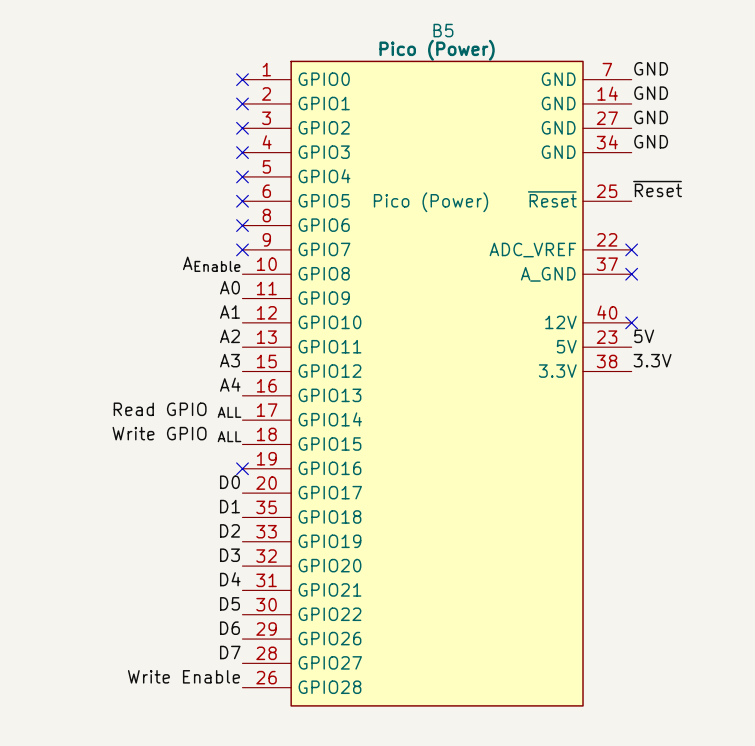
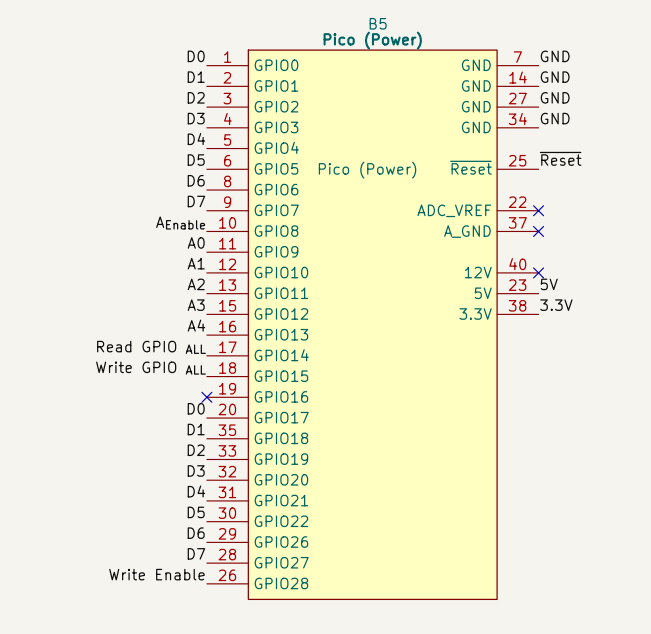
label: none -> D0 (196, 56)
no-connect mark: (242, 79) -> none
label: none -> D1 (196, 77)
no-connect mark: (242, 103) -> none
label: none -> D2 (196, 97)
no-connect mark: (242, 128) -> none
label: none -> D3 (196, 118)
no-connect mark: (242, 152) -> none
label: none -> D4 (196, 139)
no-connect mark: (242, 176) -> none
label: none -> D5 (196, 160)
no-connect mark: (242, 201) -> none
label: none -> D6 (196, 180)
no-connect mark: (242, 225) -> none
label: none -> D7 (196, 201)
no-connect mark: (242, 249) -> none

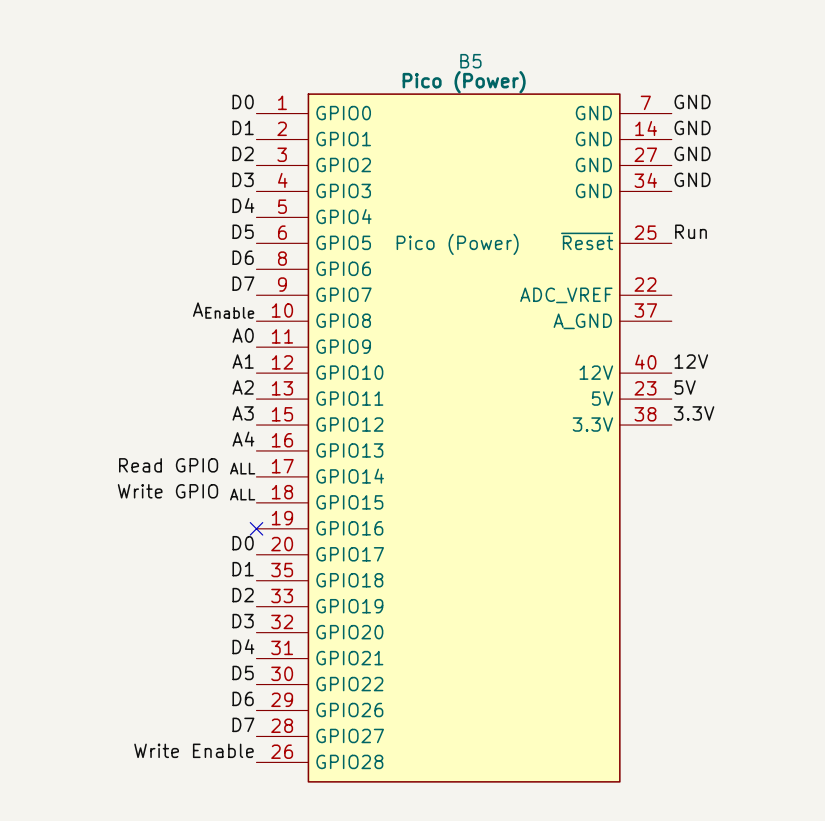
label: ~{Reset} (560, 158) -> Run (691, 231)
no-connect mark: (538, 210) -> none
no-connect mark: (538, 231) -> none
label: none -> 12V (691, 361)
no-connect mark: (538, 272) -> none

